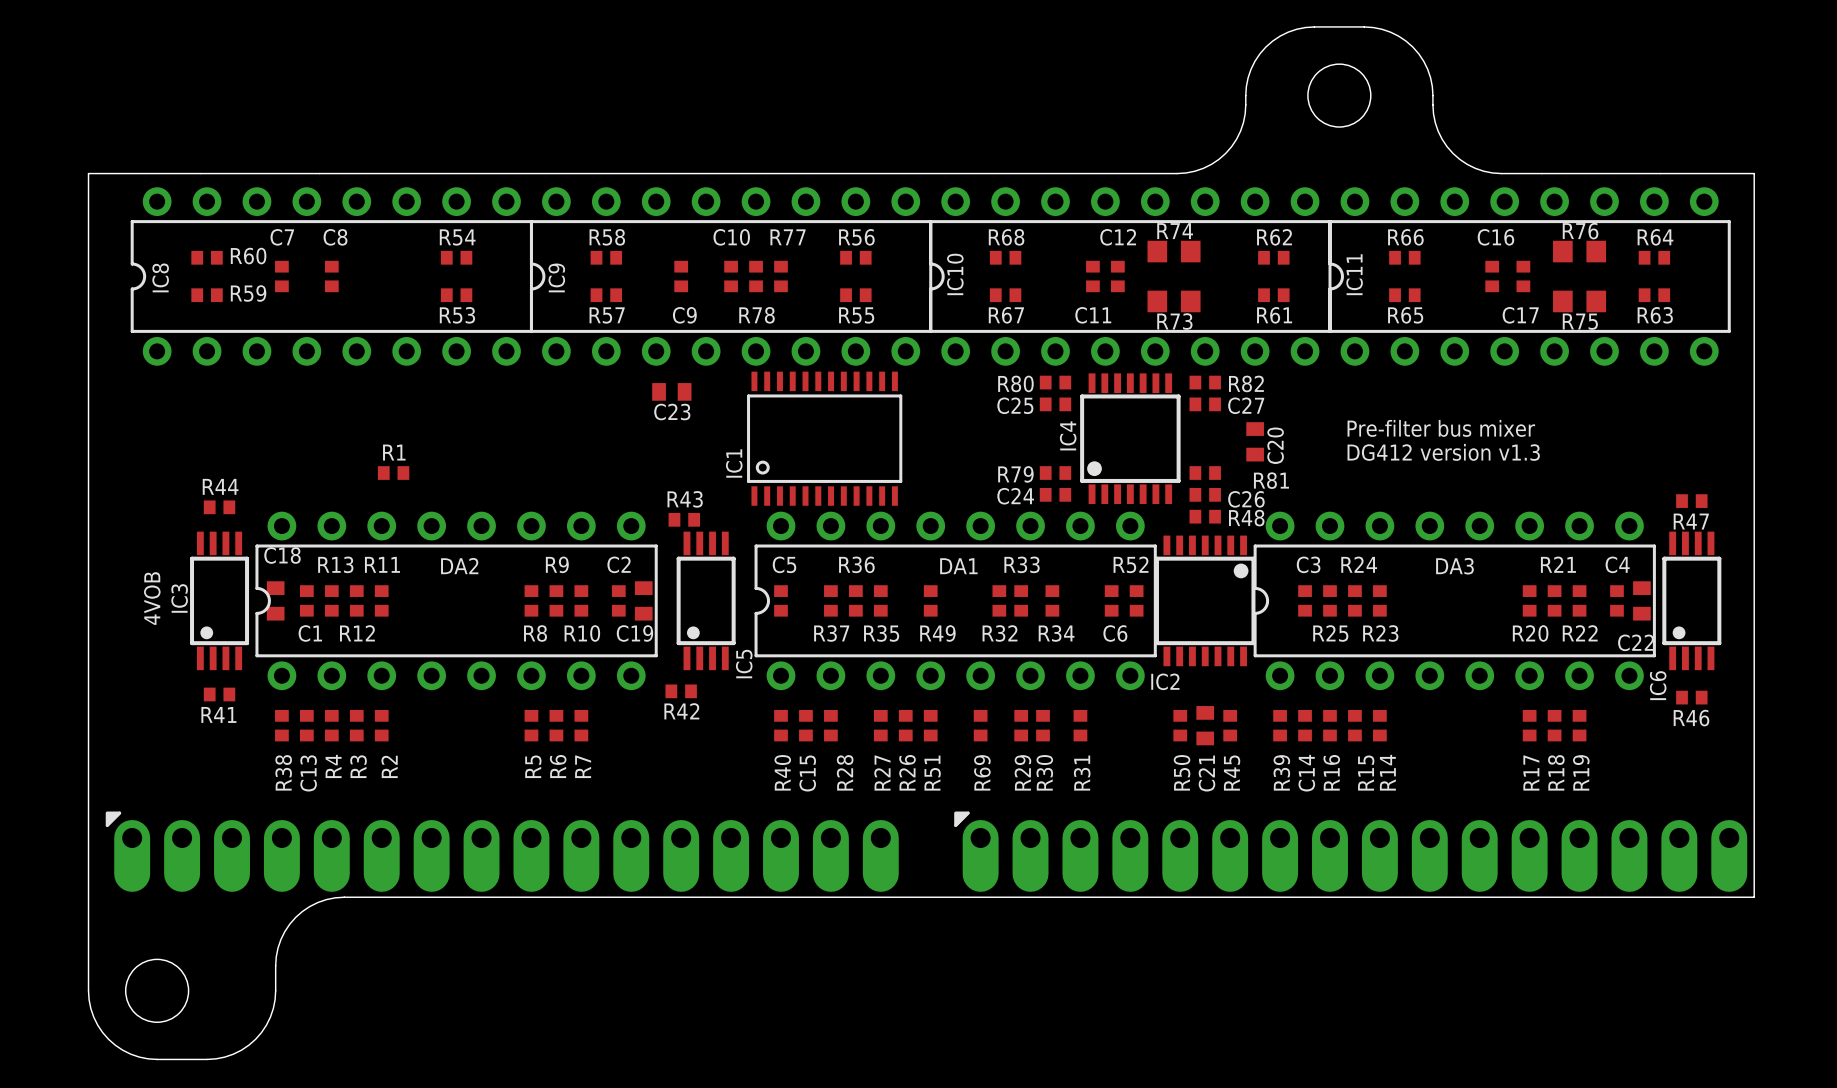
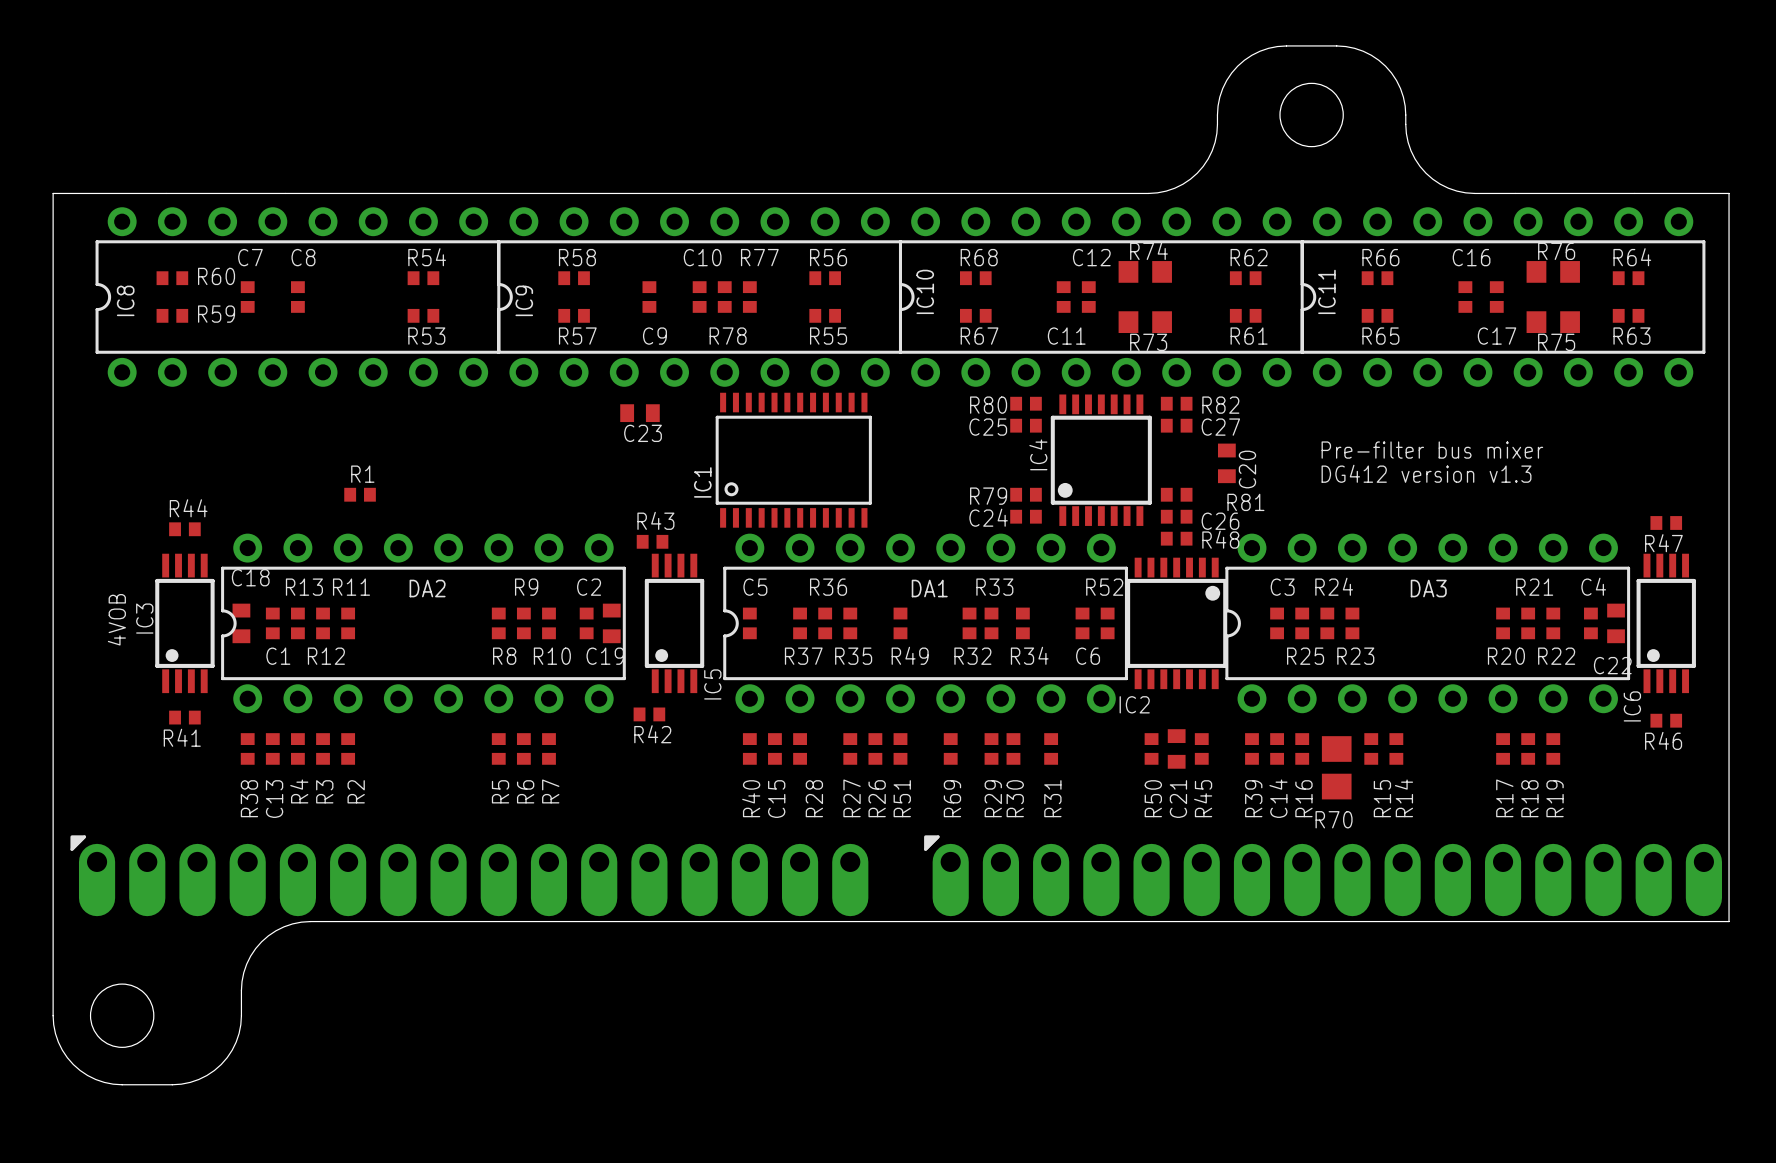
R15 position: (1354, 725) -> (1371, 748)
R14 position: (1379, 725) -> (1396, 748)
R70: none -> (1336, 767)

